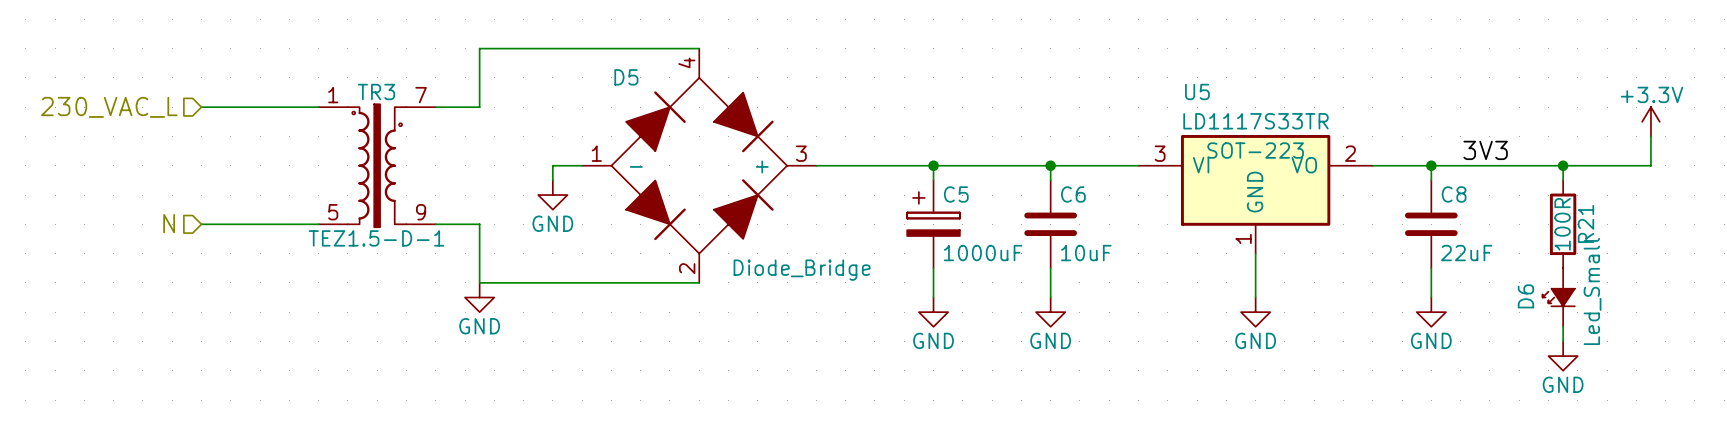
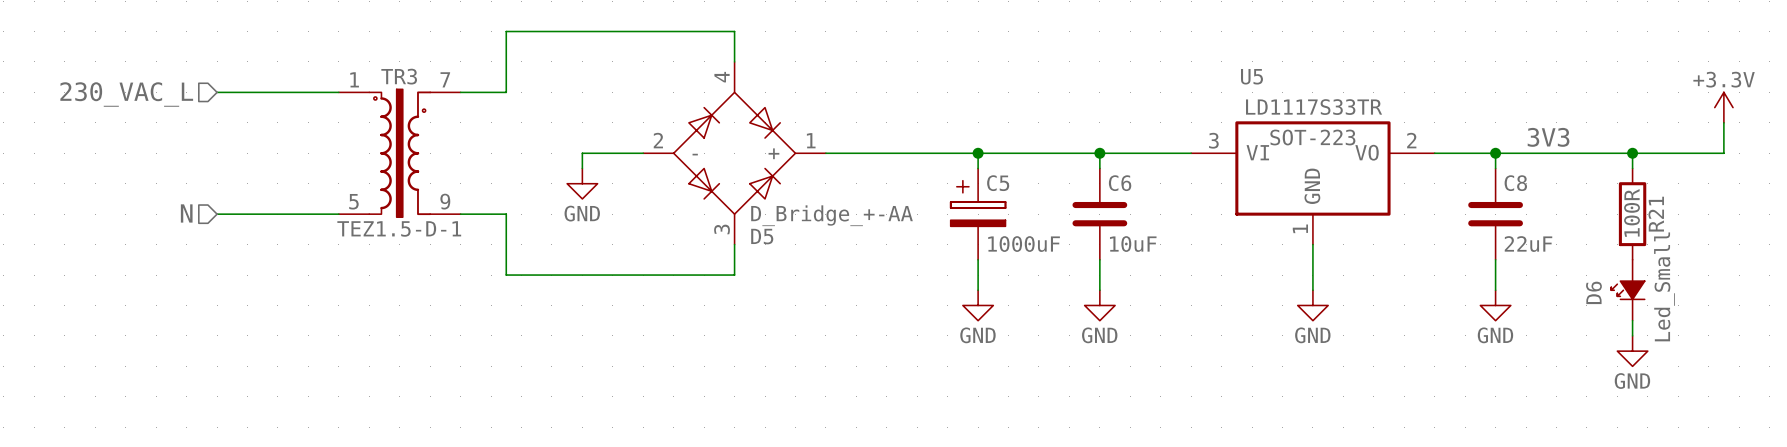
D5 symbol: [582, 48, 817, 283] -> [643, 61, 826, 245]
D5 name position: D5 (626, 77) -> D5 (762, 236)
D5 value: Diode_Bridge (802, 270) -> D_Bridge_+-AA (832, 215)
power symbol: GND (479, 297) -> none

